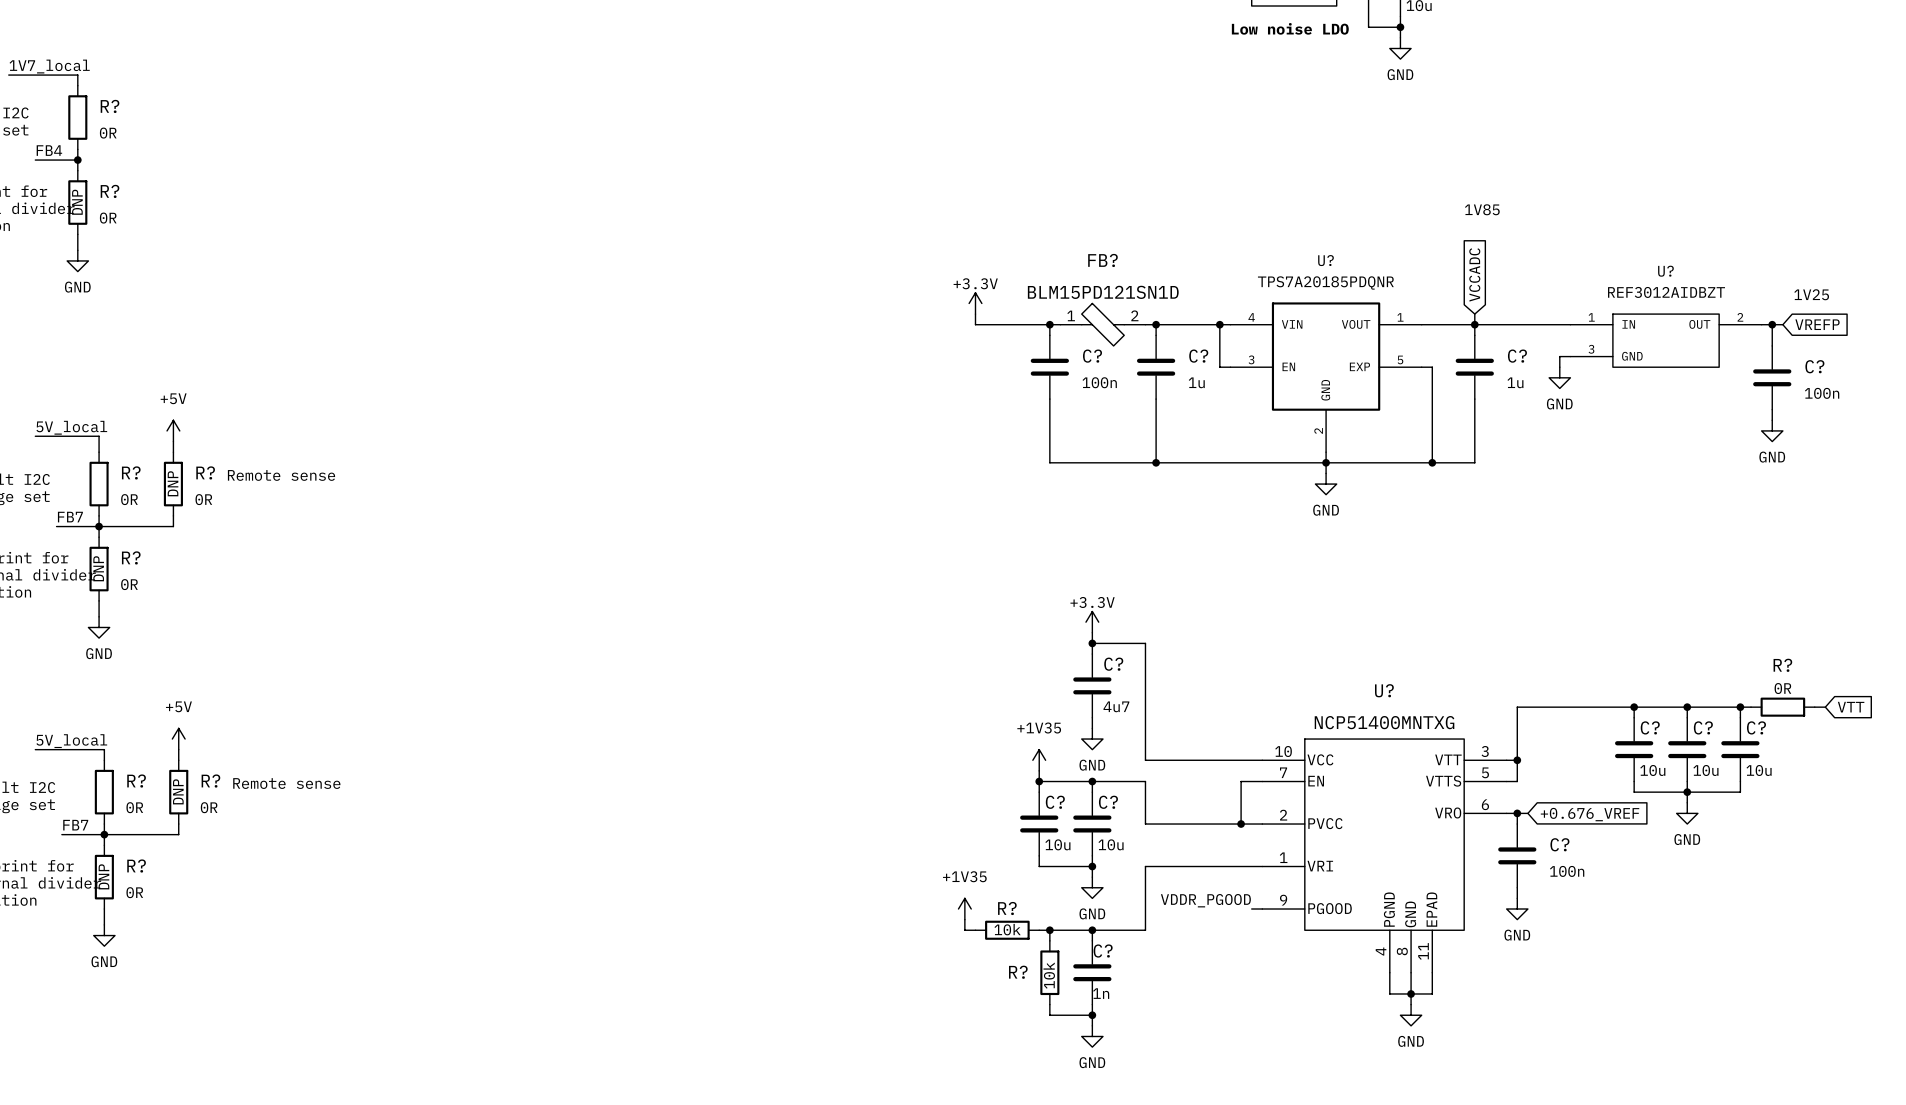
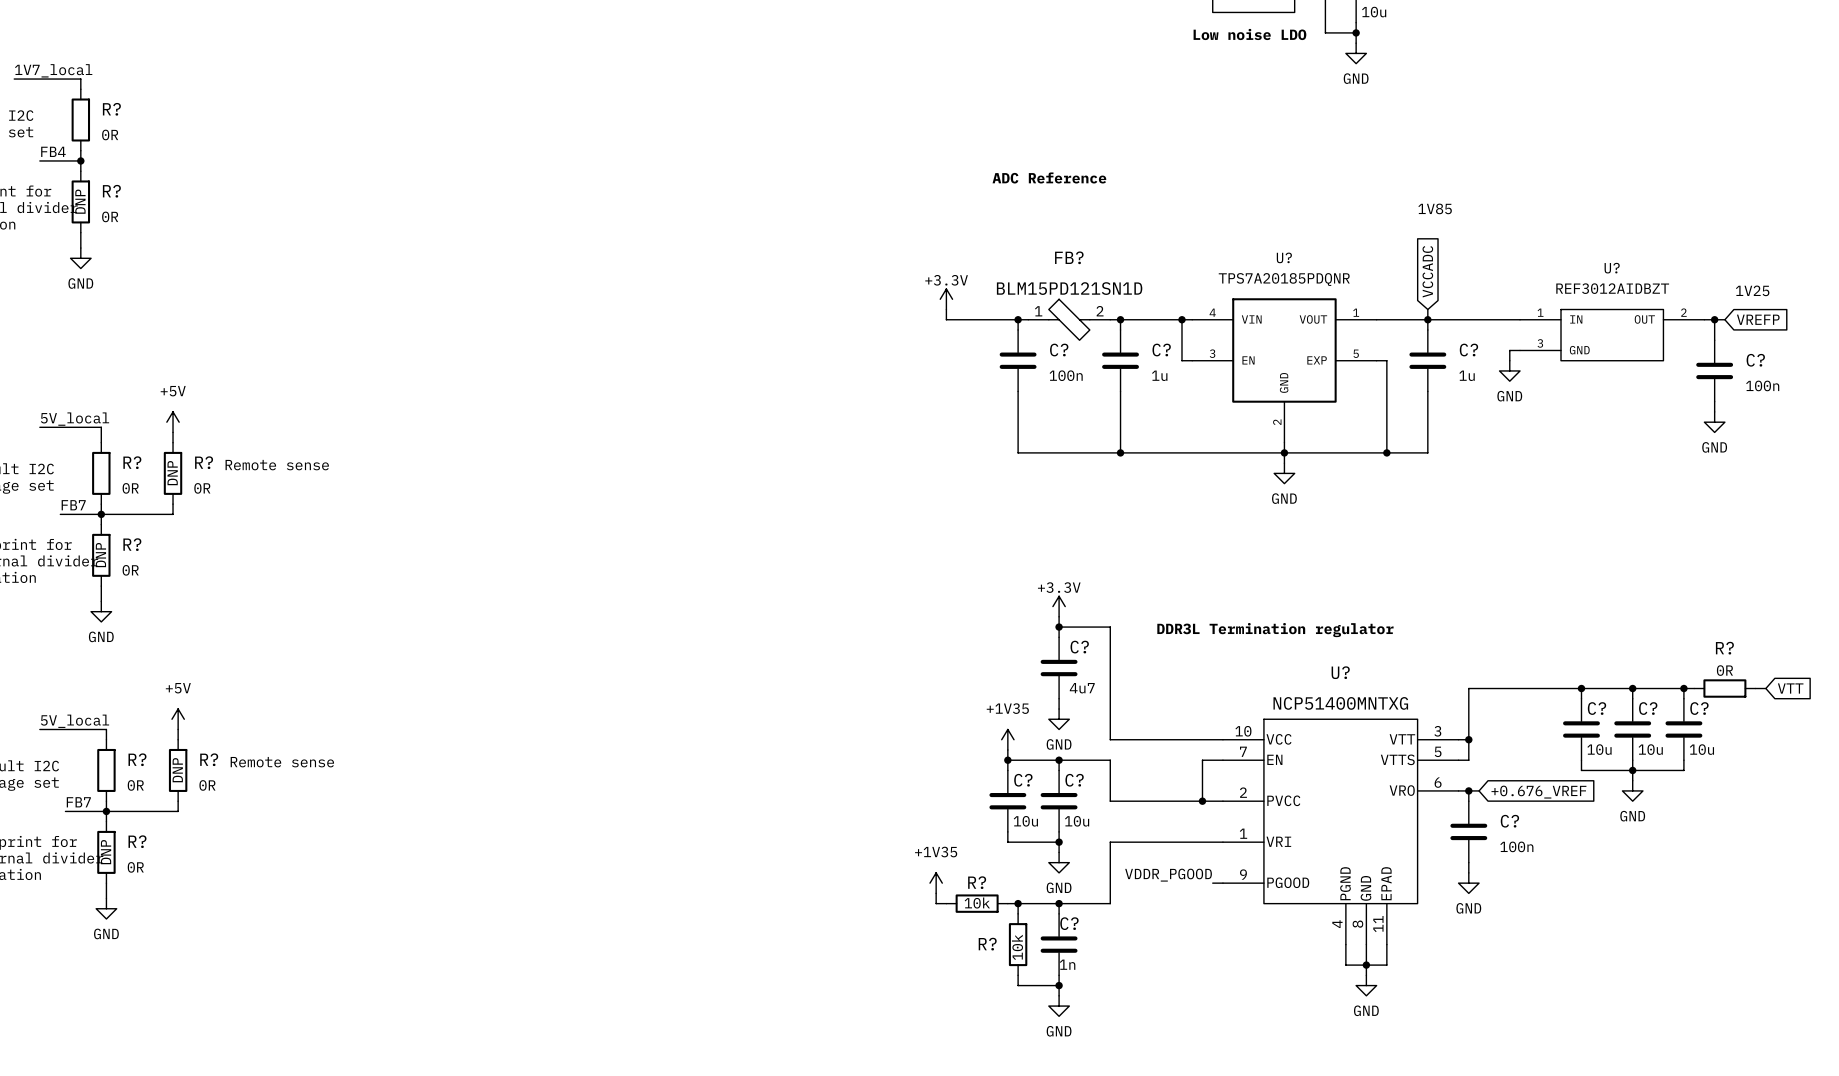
text: none -> ADC Reference (1049, 177)
text: none -> DDR3L Termination regulator (1275, 630)

